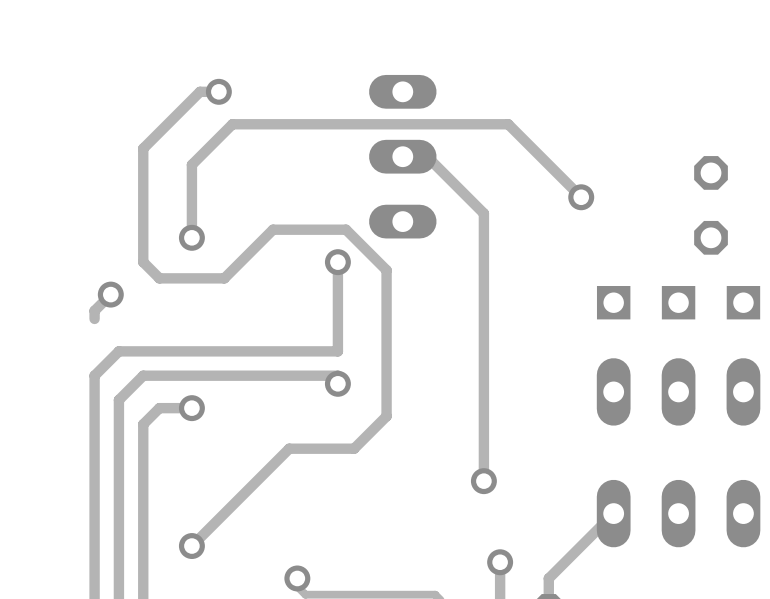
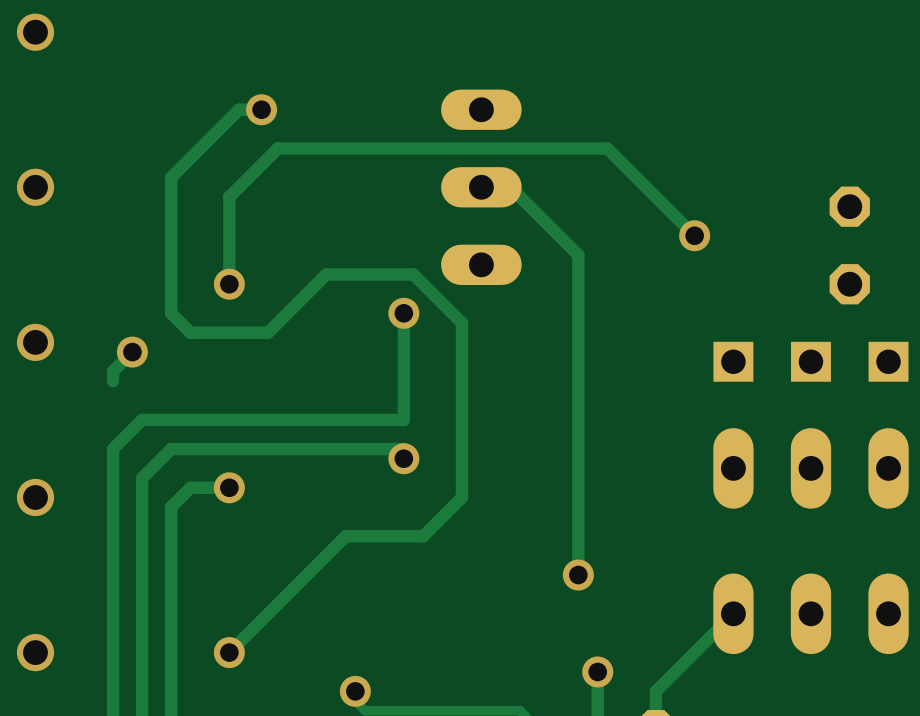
via: none -> (35, 32)
via: none -> (35, 187)
via: none -> (35, 342)
via: none -> (35, 497)
via: none -> (35, 652)

